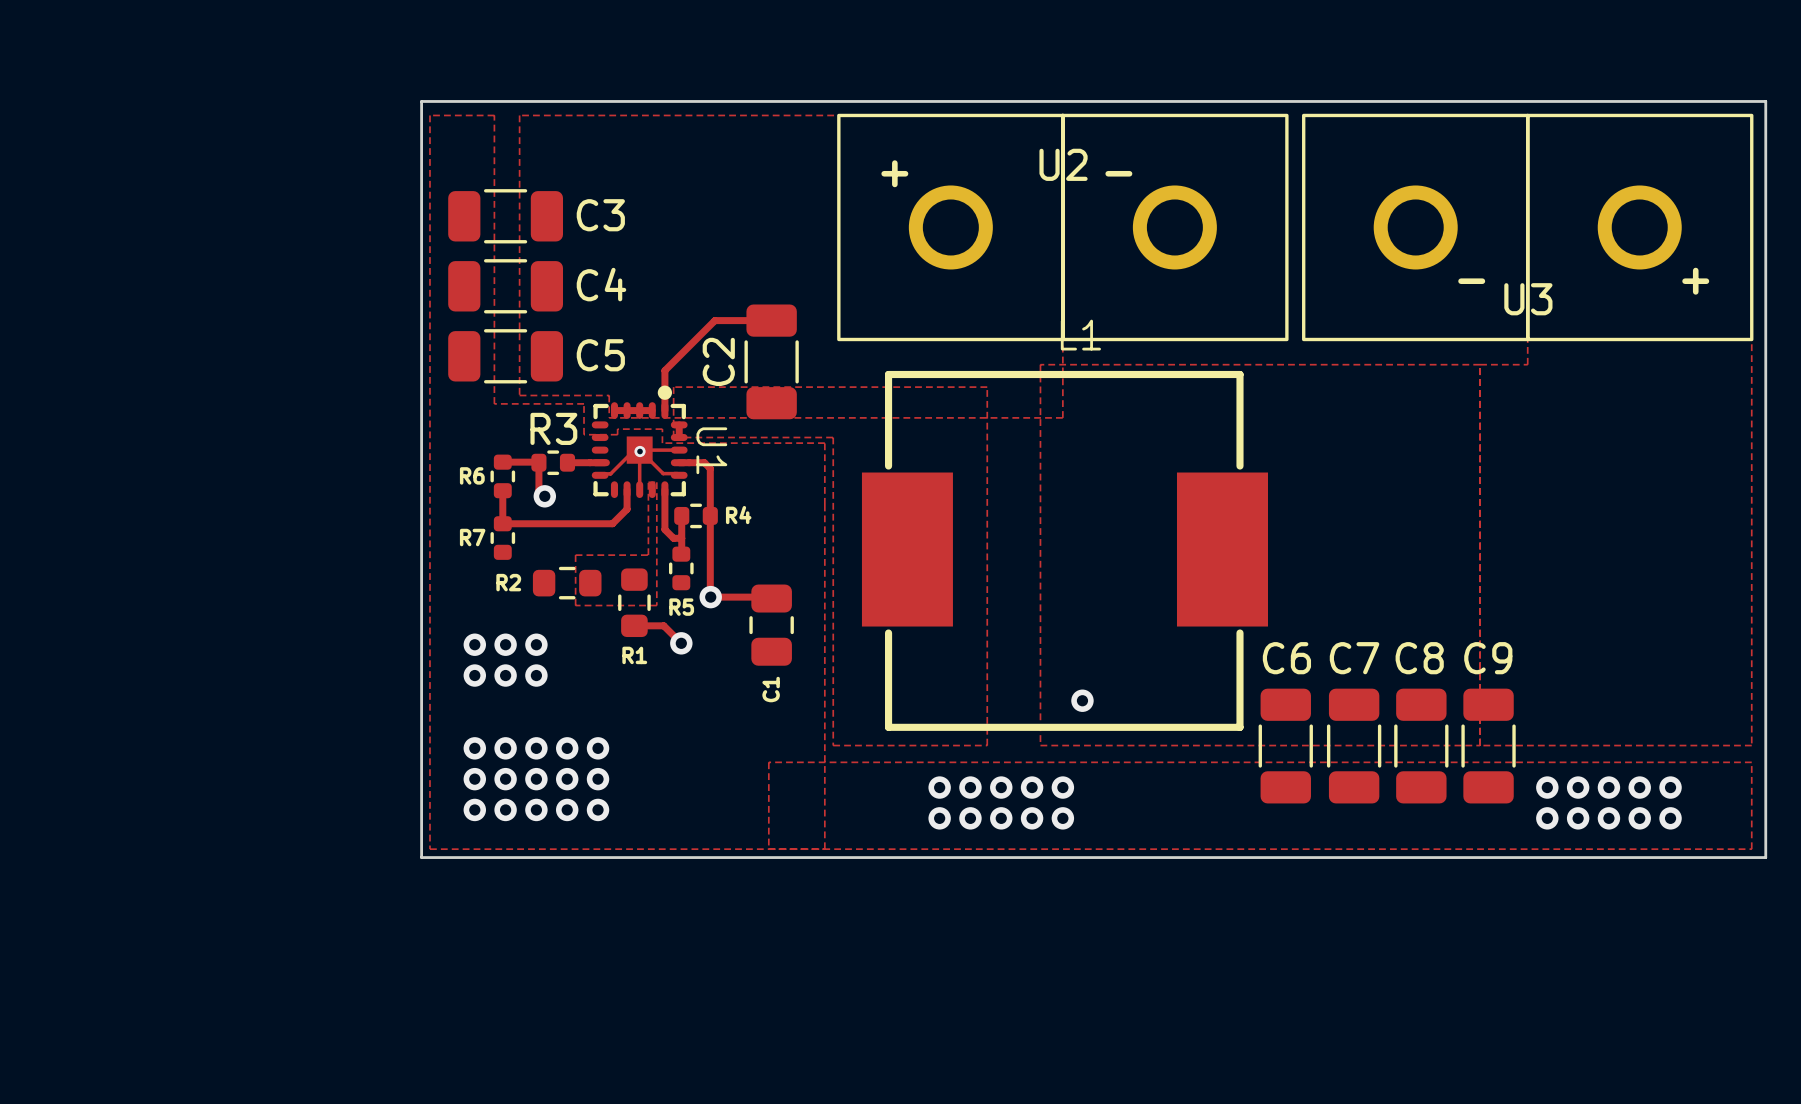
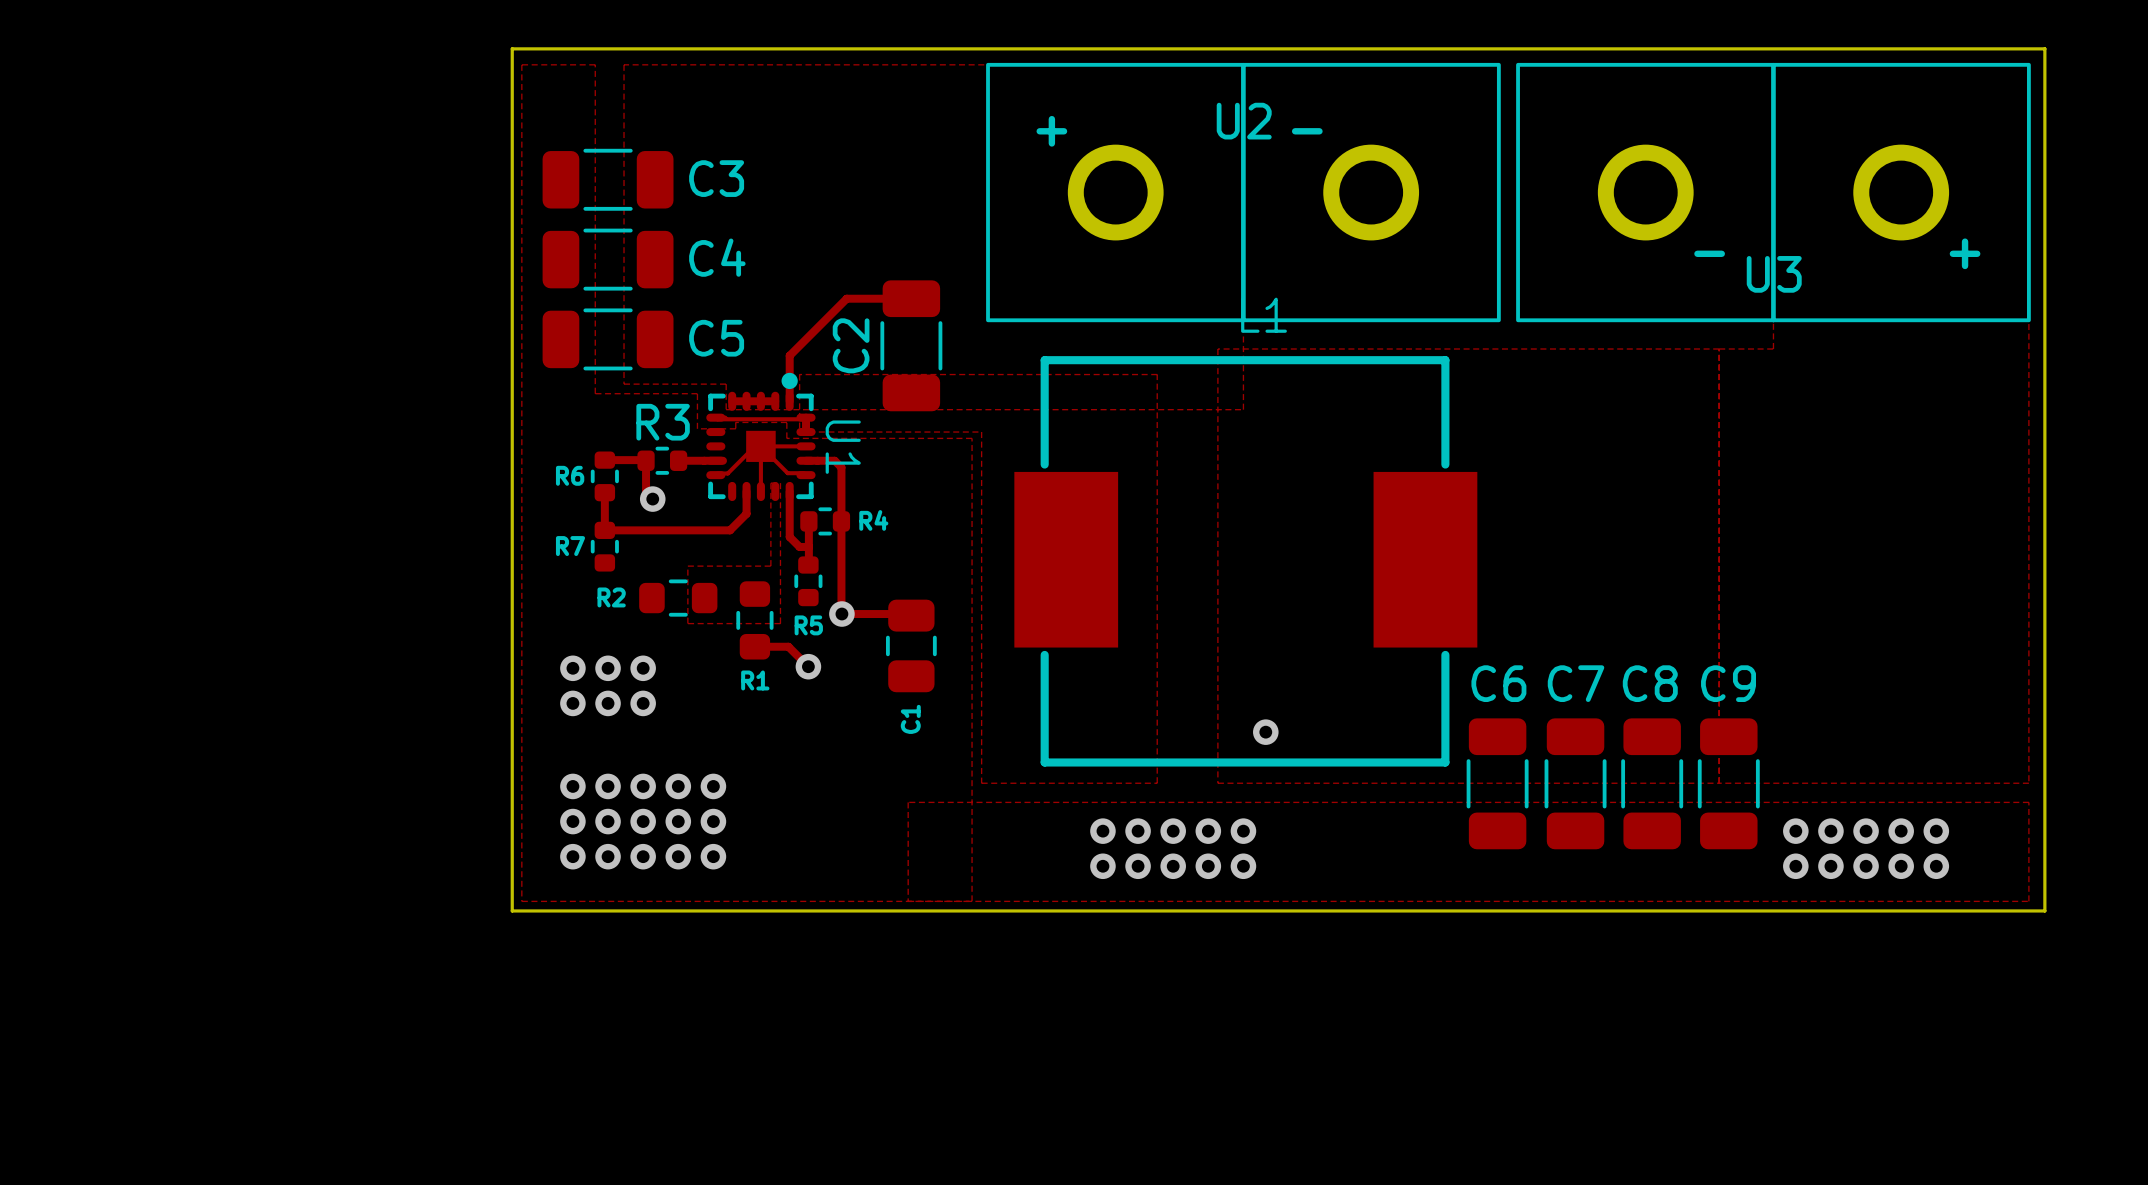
track: none -> (725, 417) (715, 417) (717, 419) (804, 419) (806, 417)
via: (640, 451) -> none

